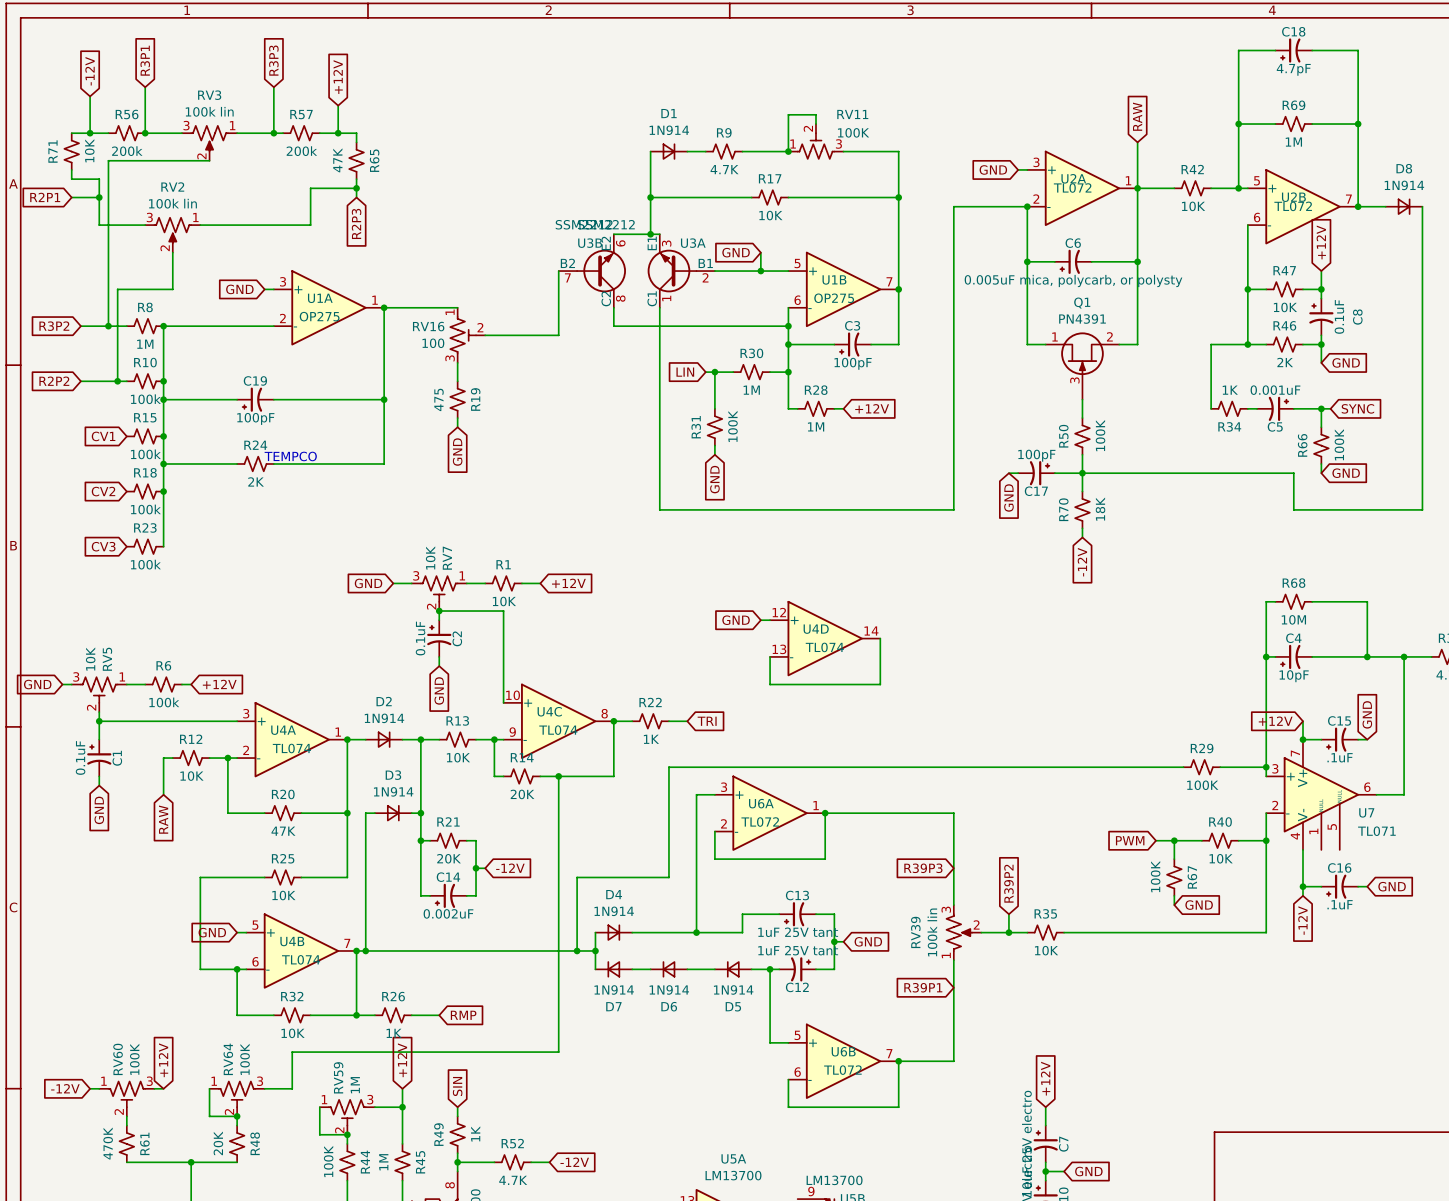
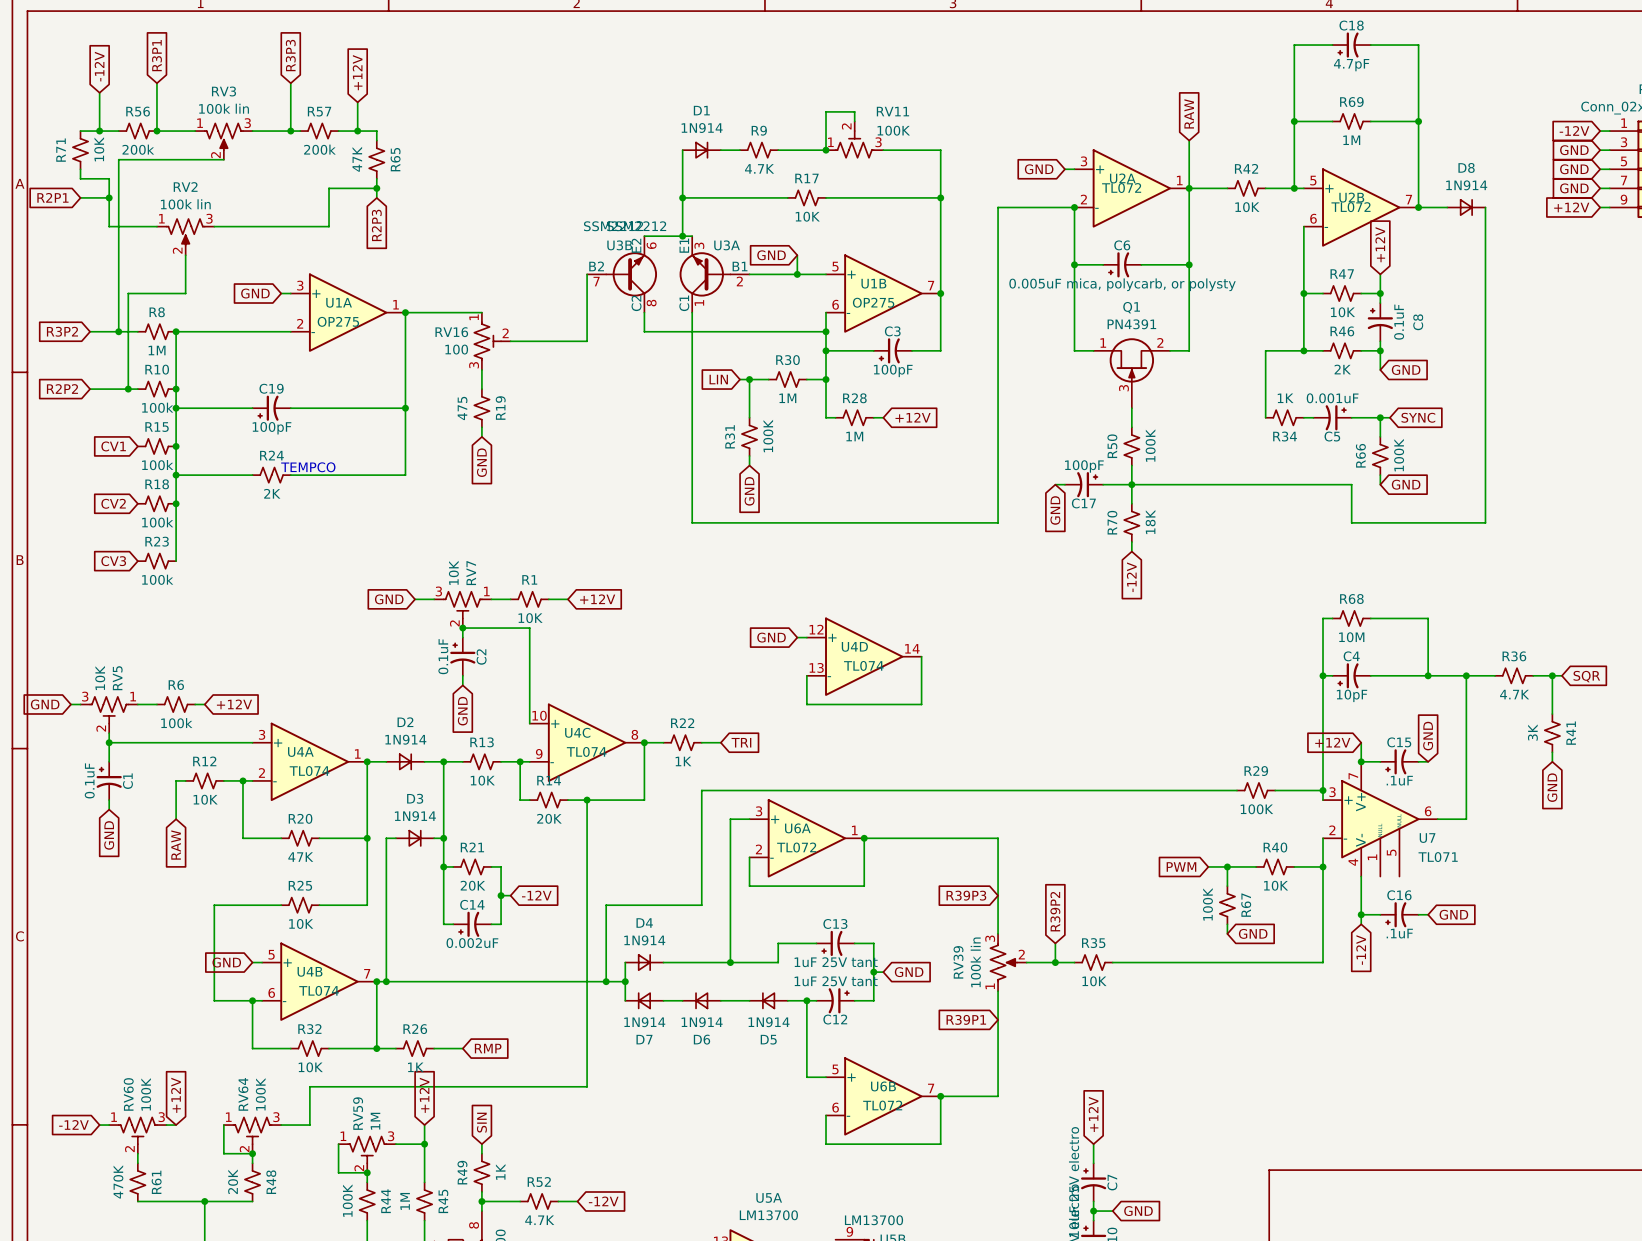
RV3 flip: as is (209, 138) -> left-right (223, 136)
RV2 flip: as is (172, 230) -> left-right (185, 232)

